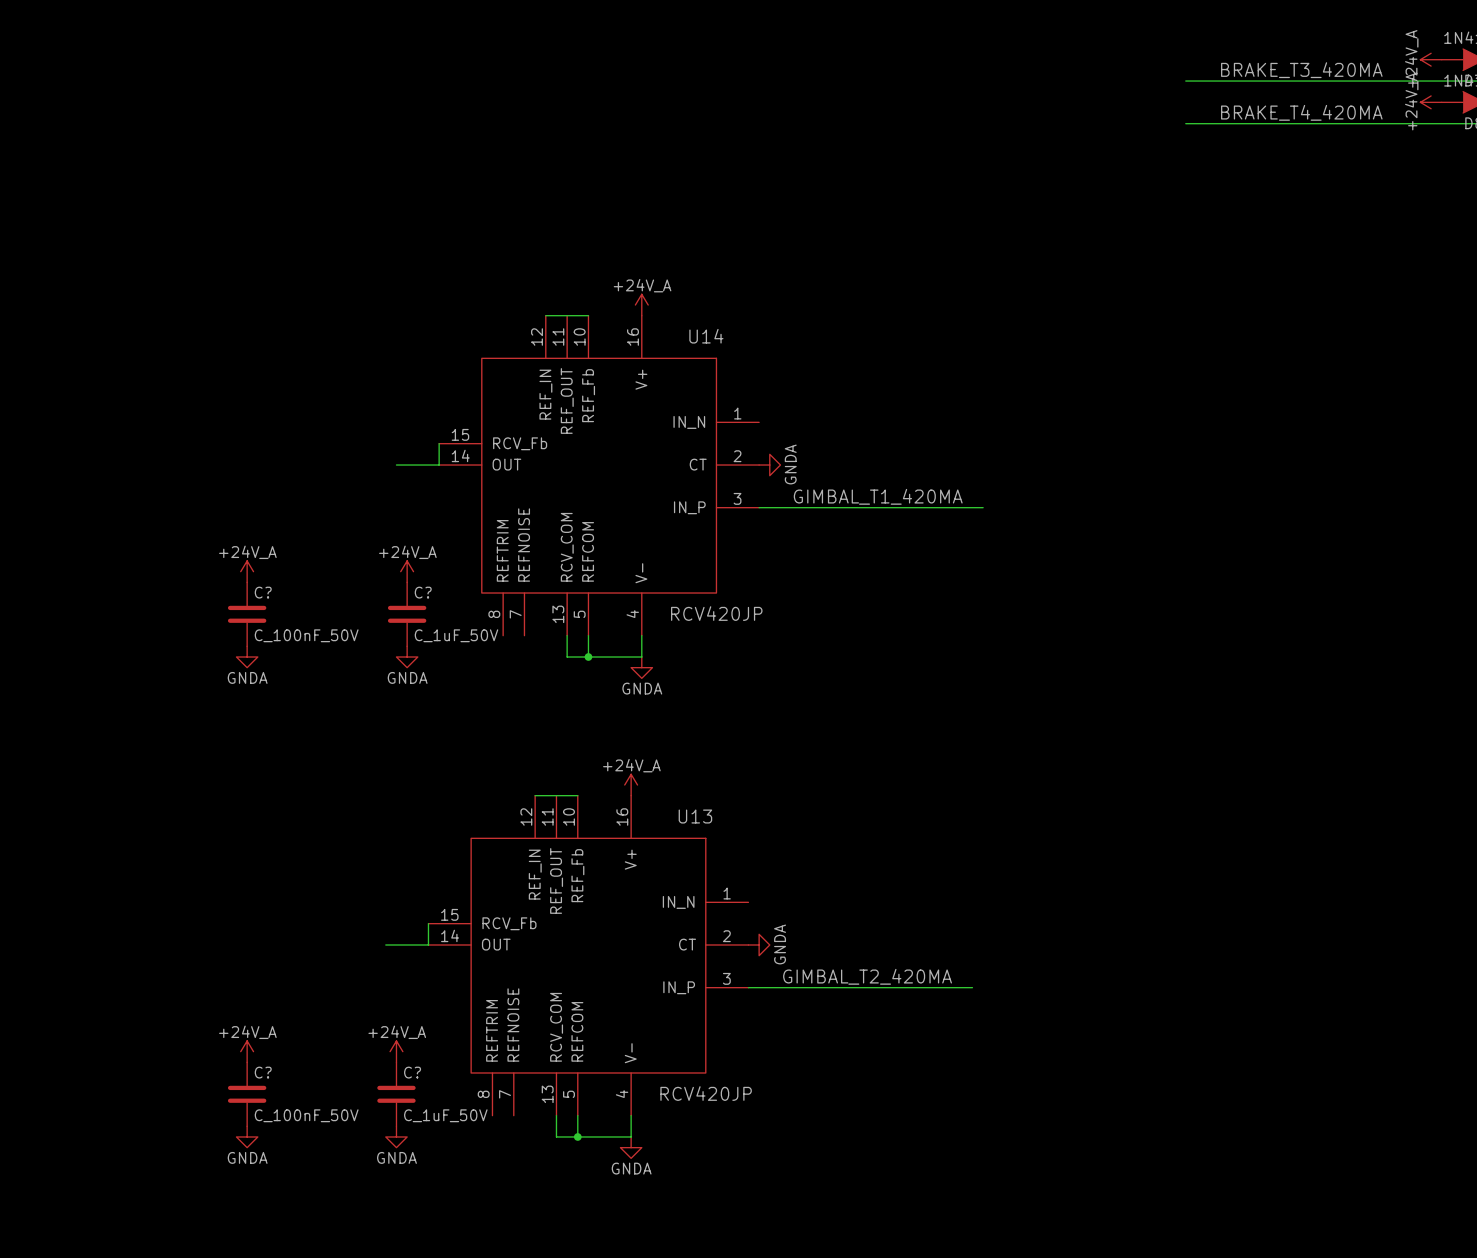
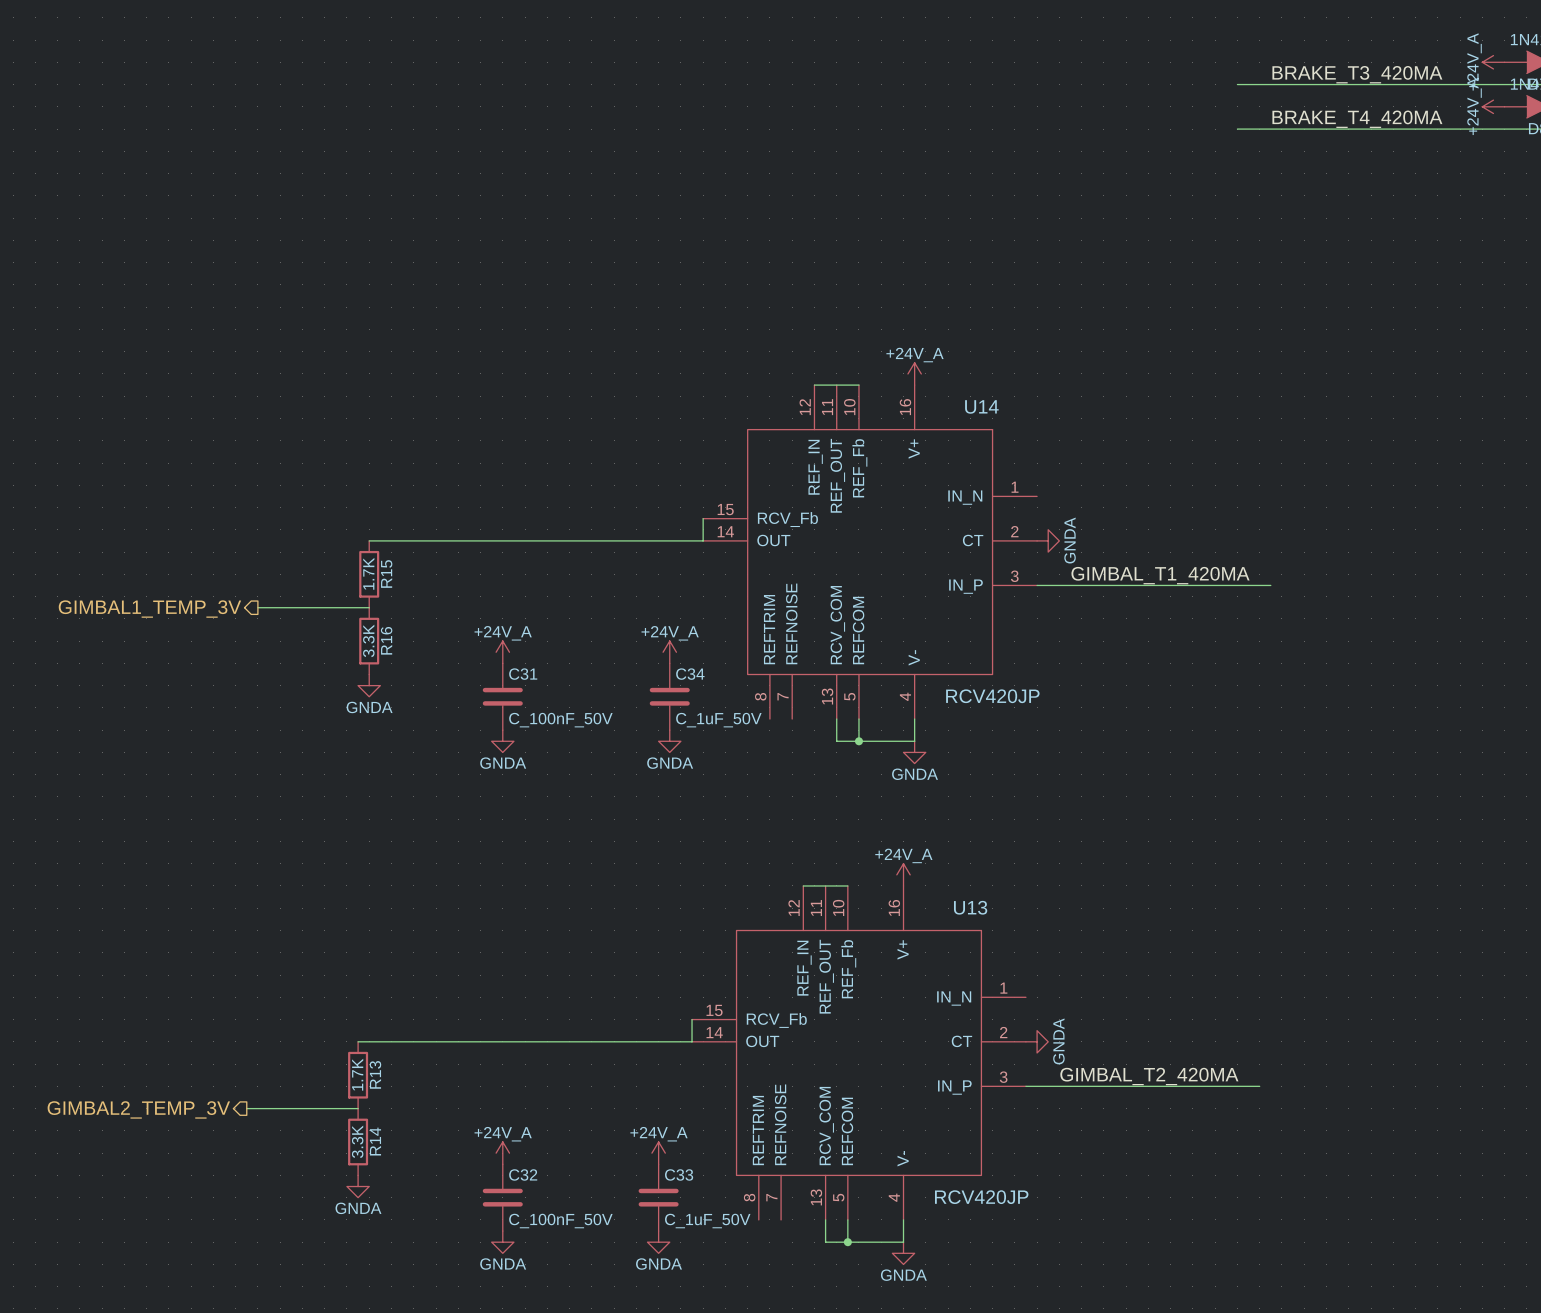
power symbol: +24V_A (641, 305) -> none
wire: (545, 315) (588, 315) -> none
power symbol: none -> +24V_A (914, 373)
wire: none -> (814, 385) (858, 385)
wire: (439, 443) (439, 465) (396, 465) -> none
power symbol: GNDA (769, 465) -> none
U14 position: (599, 475) -> (870, 552)
label: GIMBAL_T1_420MA (878, 496) -> none
wire: none -> (703, 518) (703, 540) (369, 540)
wire: (759, 507) (983, 507) -> none
power symbol: none -> GNDA (1048, 540)
R15: none -> 1.7K (369, 574)
label: none -> GIMBAL_T1_420MA (1160, 575)
wire: none -> (1037, 585) (1270, 585)
power symbol: +24V_A (247, 571) -> none
power symbol position: +24V_A (407, 571) -> +24V_A (502, 652)
hierarchical label: none -> GIMBAL1_TEMP_3V (149, 609)
wire: none -> (257, 607) (369, 607)
C?: C_100nF_50V (247, 614) -> none
R16: none -> 3.3K (369, 641)
C?: C_1uF_50V (407, 614) -> none
power symbol: none -> +24V_A (669, 652)
wire: (567, 635) (567, 657) (641, 657) (641, 635) -> none
wire: (588, 635) (588, 657) -> none
power symbol: GNDA (247, 657) -> none
power symbol: none -> GNDA (369, 685)
power symbol: GNDA (407, 657) -> none
junction: (588, 657) -> none
C31: none -> C_100nF_50V (502, 696)
C34: none -> C_1uF_50V (669, 696)
power symbol position: GNDA (641, 667) -> GNDA (669, 741)
wire: none -> (836, 719) (836, 741) (914, 741) (914, 719)
wire: none -> (858, 719) (858, 741)
power symbol: none -> GNDA (502, 741)
junction: none -> (858, 741)
power symbol: none -> GNDA (914, 752)
power symbol: +24V_A (631, 785) -> none
wire: (535, 795) (577, 795) -> none
power symbol: none -> +24V_A (903, 874)
wire: none -> (803, 885) (847, 885)
wire: (428, 923) (428, 944) (385, 944) -> none
power symbol: GNDA (759, 944) -> none
U13 position: (588, 955) -> (858, 1052)
wire: none -> (692, 1019) (692, 1041) (358, 1041)
label: GIMBAL_T2_420MA (867, 976) -> none
wire: (748, 987) (972, 987) -> none
power symbol: none -> GNDA (1037, 1041)
R13: none -> 1.7K (358, 1075)
label: none -> GIMBAL_T2_420MA (1149, 1076)
wire: none -> (1025, 1086) (1259, 1086)
power symbol: +24V_A (247, 1051) -> none
power symbol position: +24V_A (396, 1051) -> +24V_A (502, 1153)
hierarchical label: none -> GIMBAL2_TEMP_3V (138, 1109)
wire: none -> (246, 1108) (358, 1108)
C?: C_100nF_50V (247, 1094) -> none
R14: none -> 3.3K (358, 1142)
C?: C_1uF_50V (396, 1094) -> none
power symbol: none -> +24V_A (658, 1153)
wire: (556, 1115) (556, 1136) (631, 1136) (631, 1115) -> none
wire: (577, 1115) (577, 1136) -> none
power symbol: GNDA (247, 1136) -> none
power symbol: none -> GNDA (358, 1186)
power symbol: GNDA (396, 1136) -> none
junction: (577, 1136) -> none
C32: none -> C_100nF_50V (502, 1197)
C33: none -> C_1uF_50V (658, 1197)
power symbol position: GNDA (631, 1147) -> GNDA (658, 1242)
wire: none -> (825, 1219) (825, 1242) (903, 1242) (903, 1219)
wire: none -> (847, 1219) (847, 1242)
power symbol: none -> GNDA (502, 1242)
junction: none -> (847, 1242)
power symbol: none -> GNDA (903, 1253)

